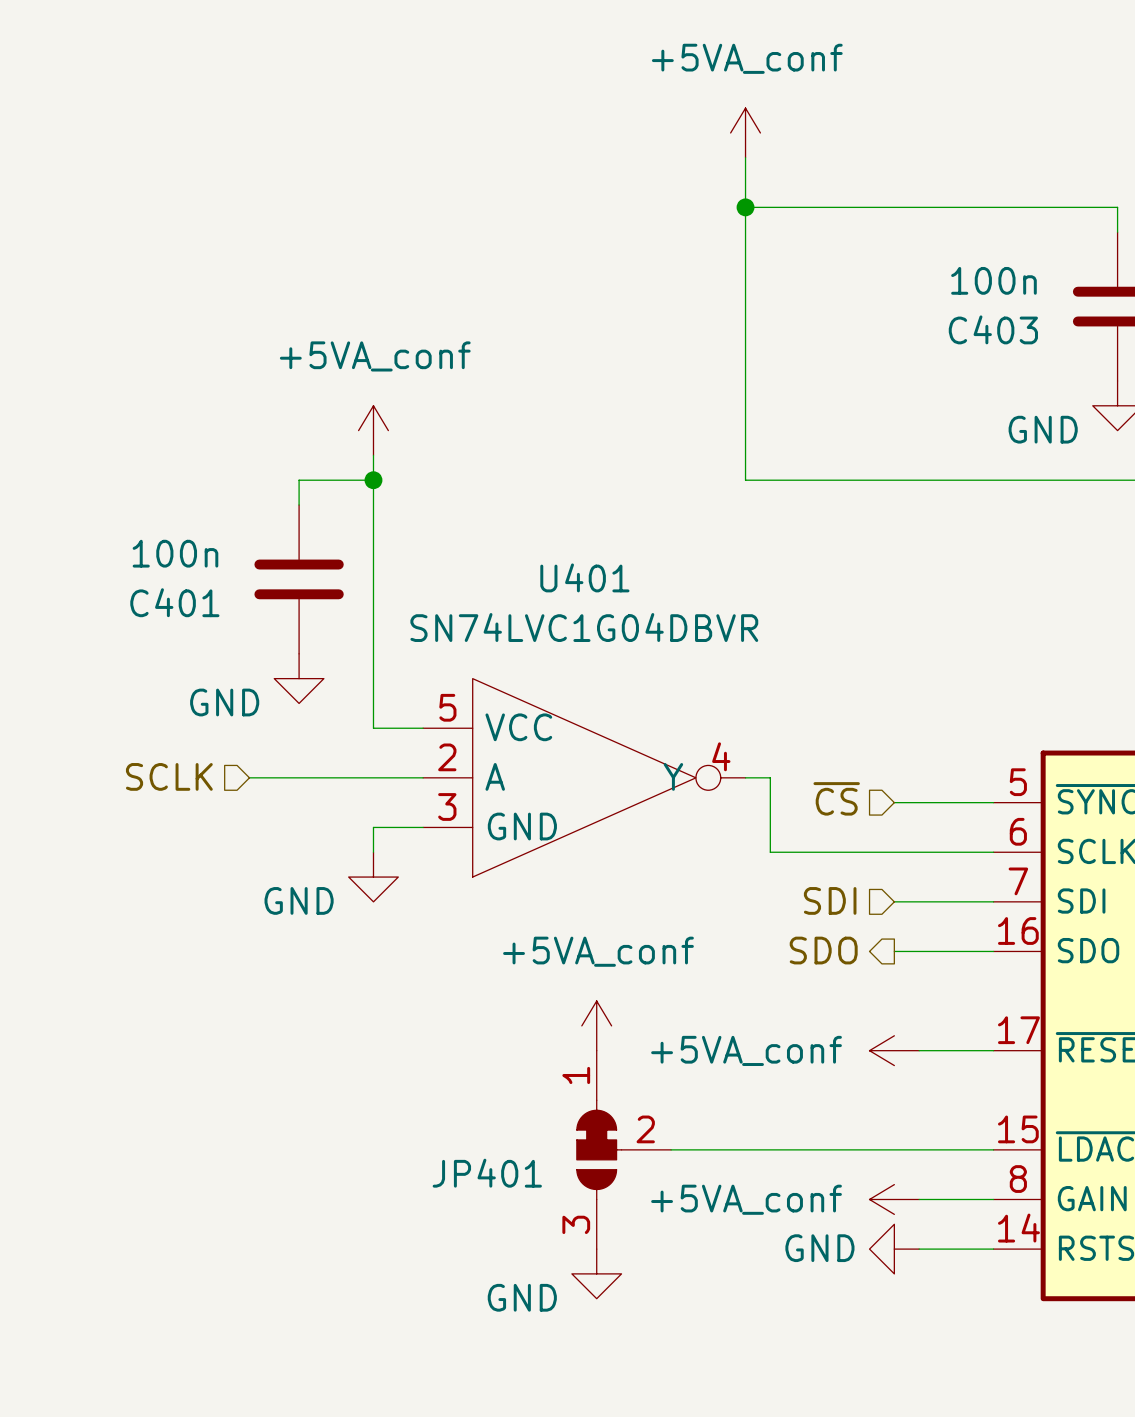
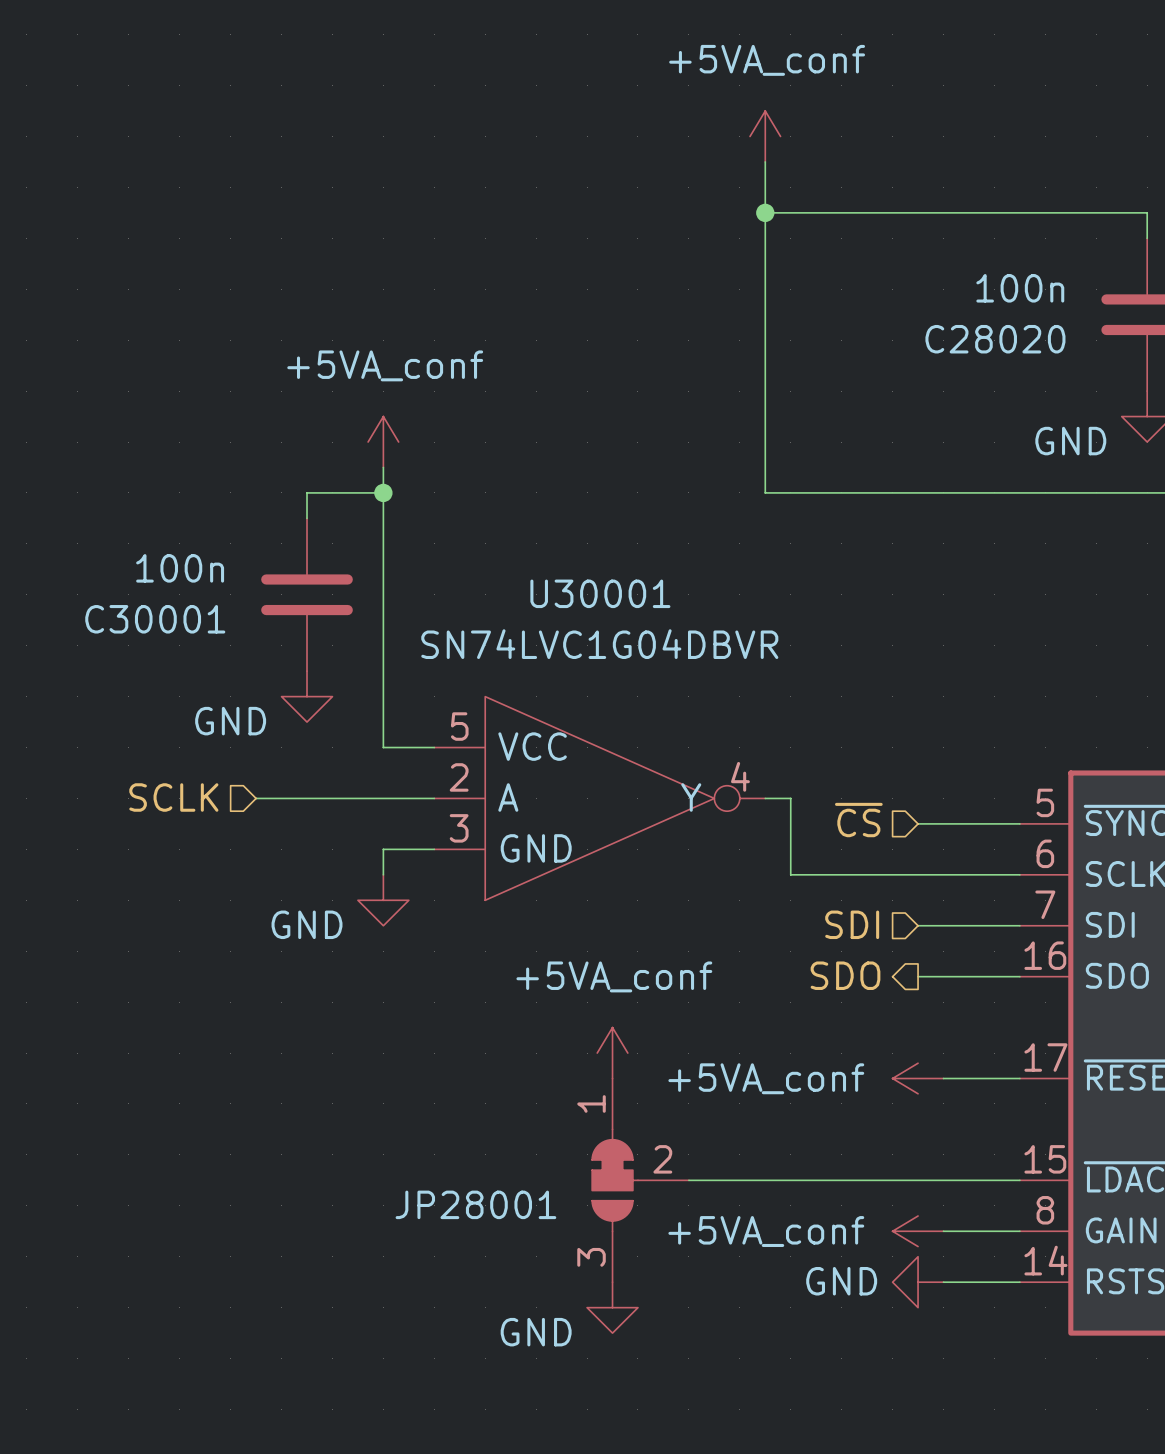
C403 name: C403 (993, 329) -> C28020 (995, 339)
U401 name: U401 (584, 577) -> U30001 (600, 593)
C401 name: C401 (174, 602) -> C30001 (155, 619)
JP401 name: JP401 (487, 1173) -> JP28001 (475, 1204)

